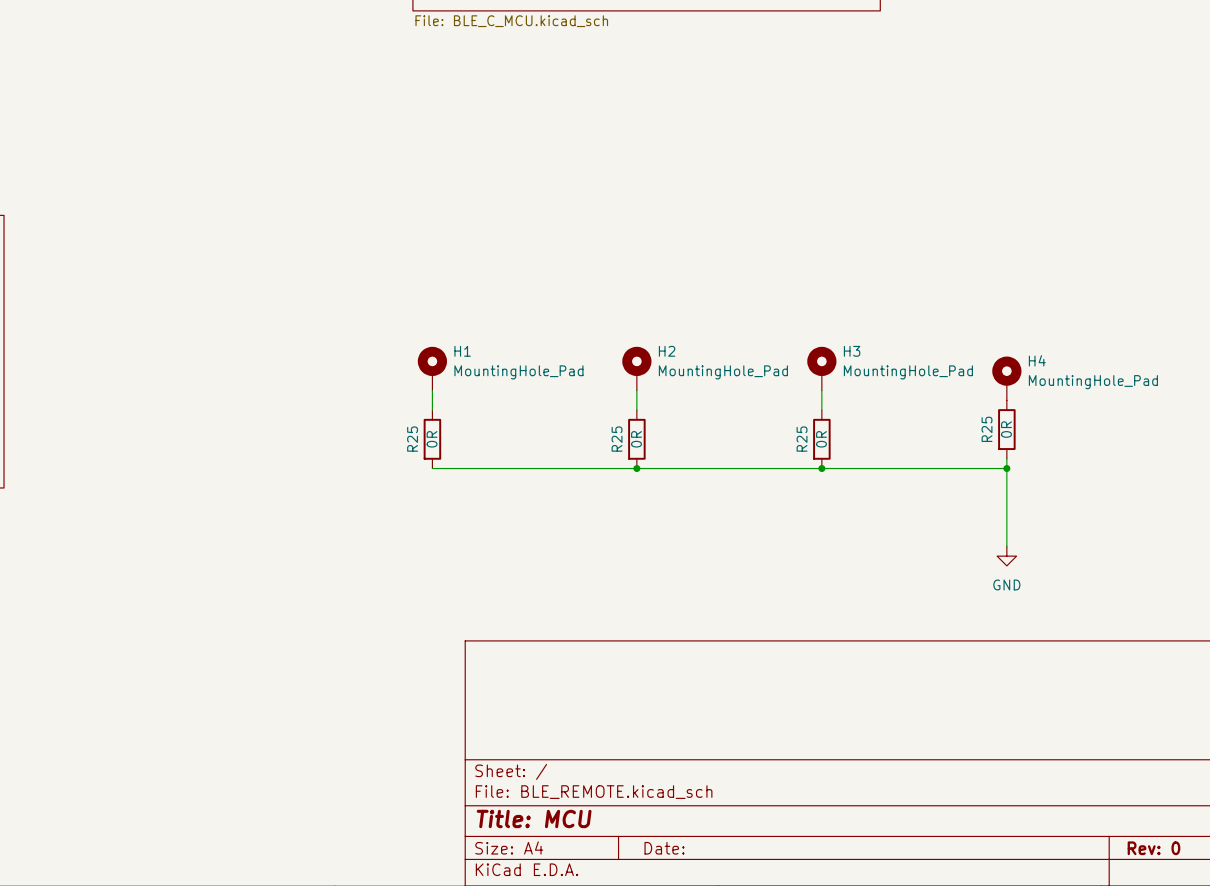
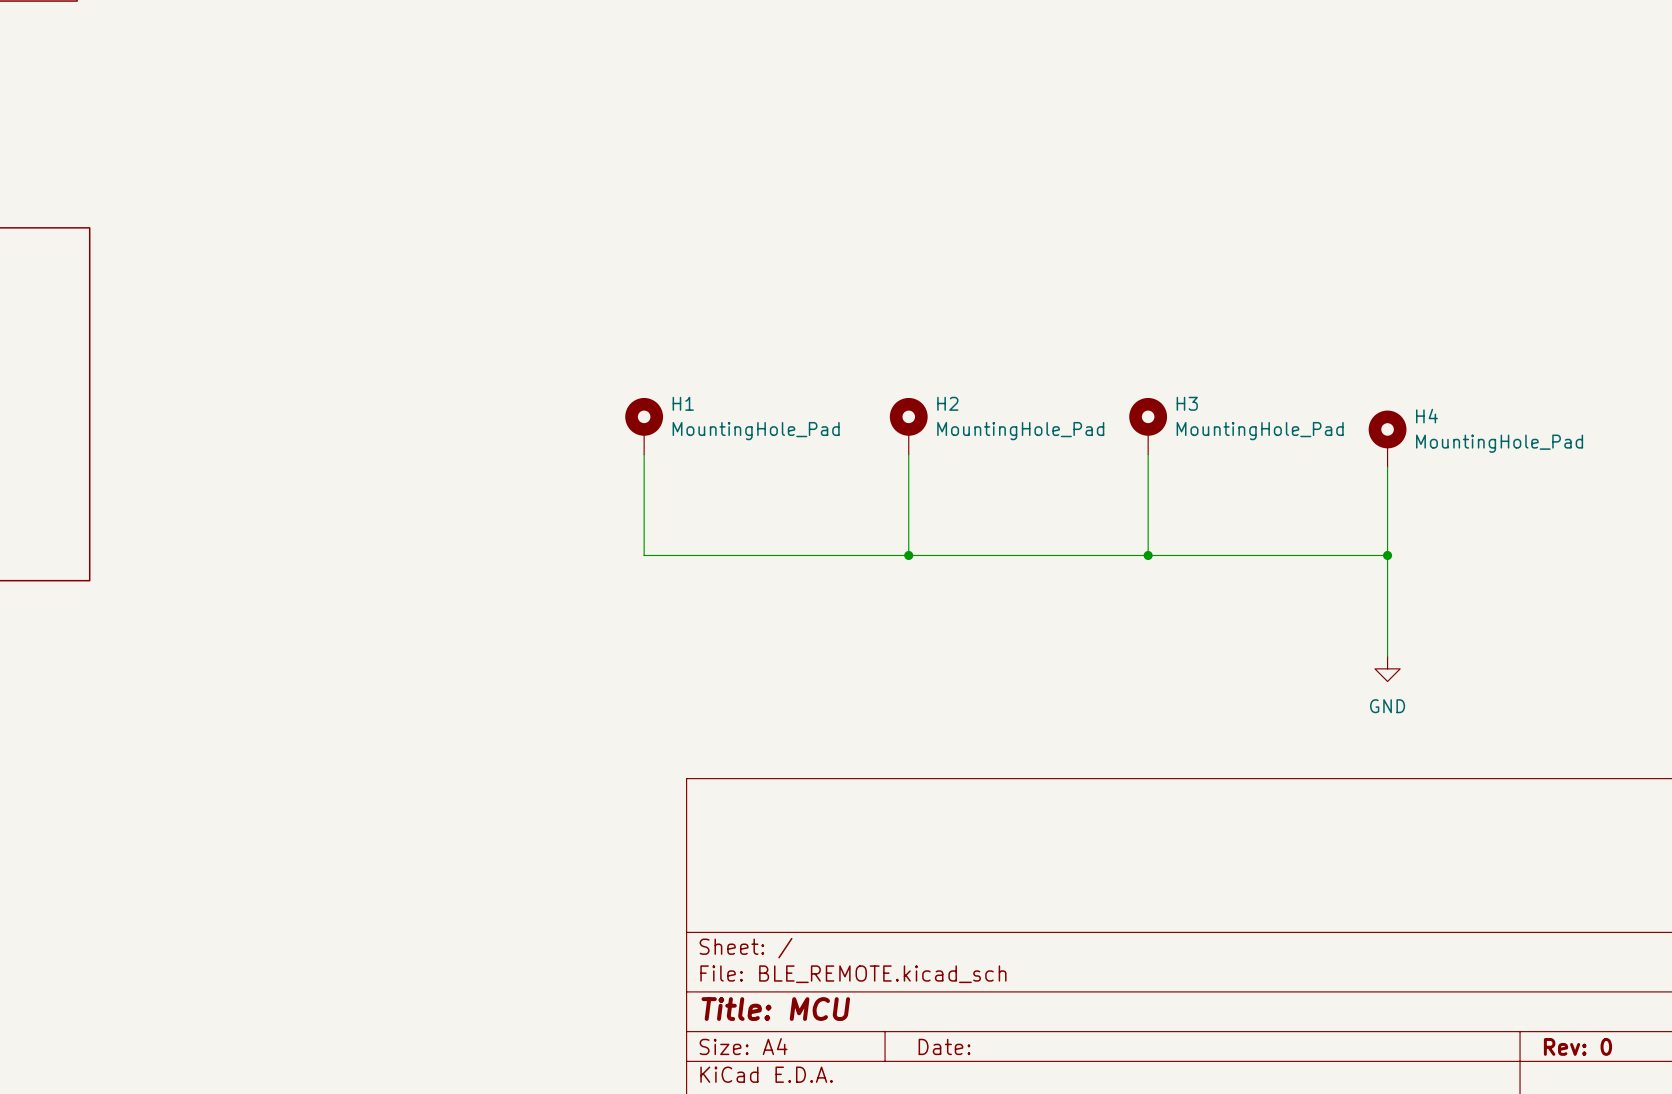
wire: none -> (1387, 467) (1387, 542)
wire: none -> (644, 479) (644, 555)
wire: none -> (908, 479) (908, 555)
wire: none -> (1148, 479) (1148, 555)
R25: 0R (1006, 429) -> none
R25: 0R (432, 439) -> none
R25: 0R (636, 439) -> none
R25: 0R (821, 439) -> none

